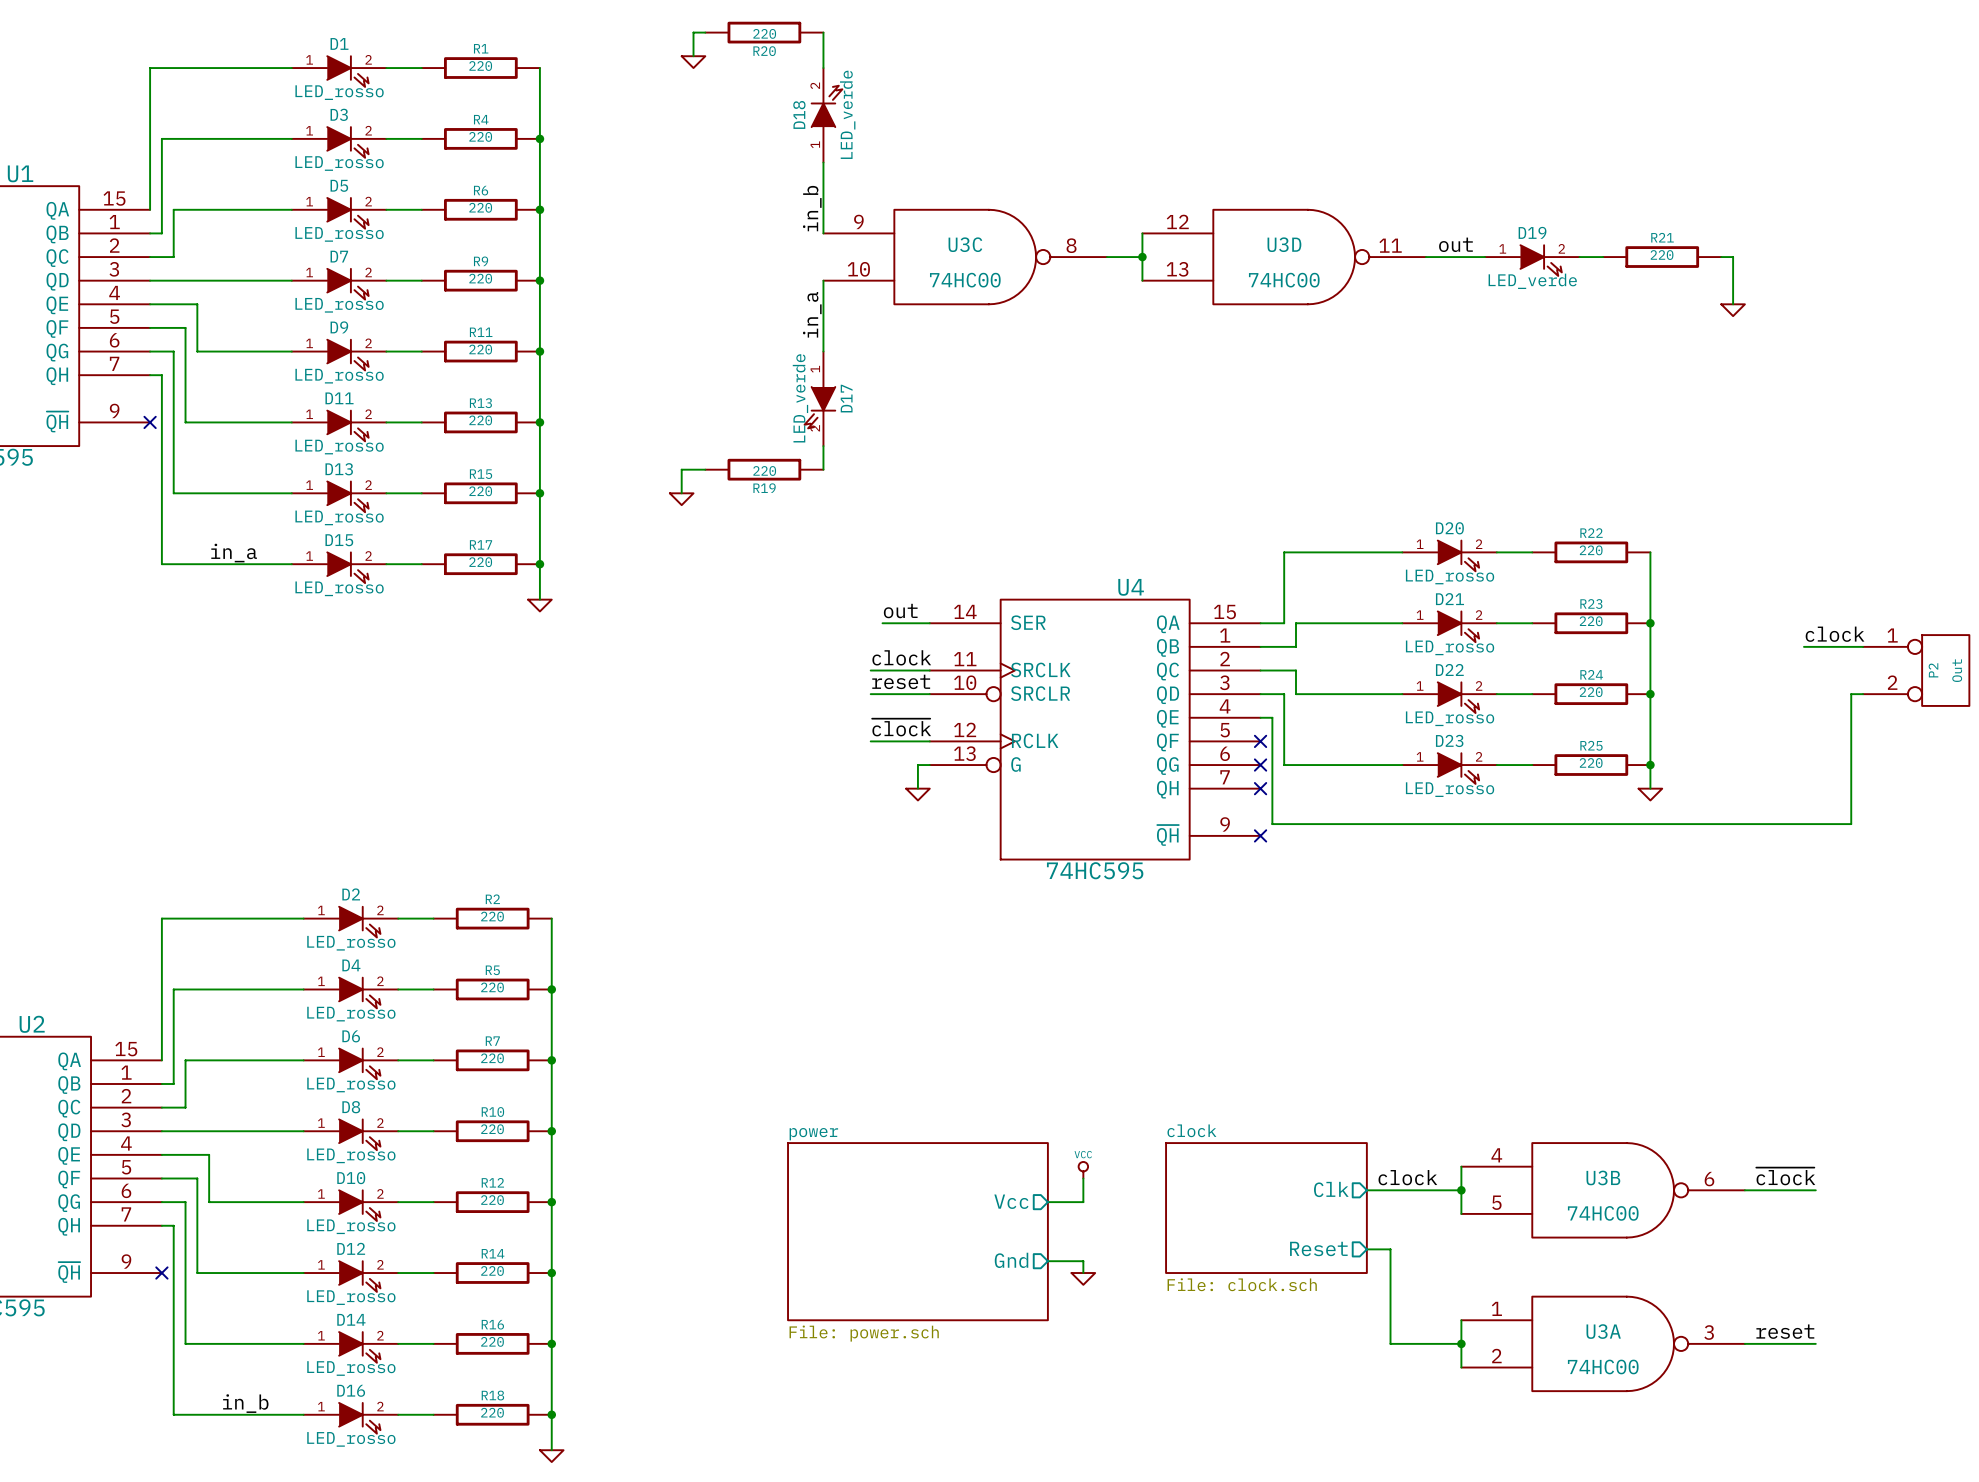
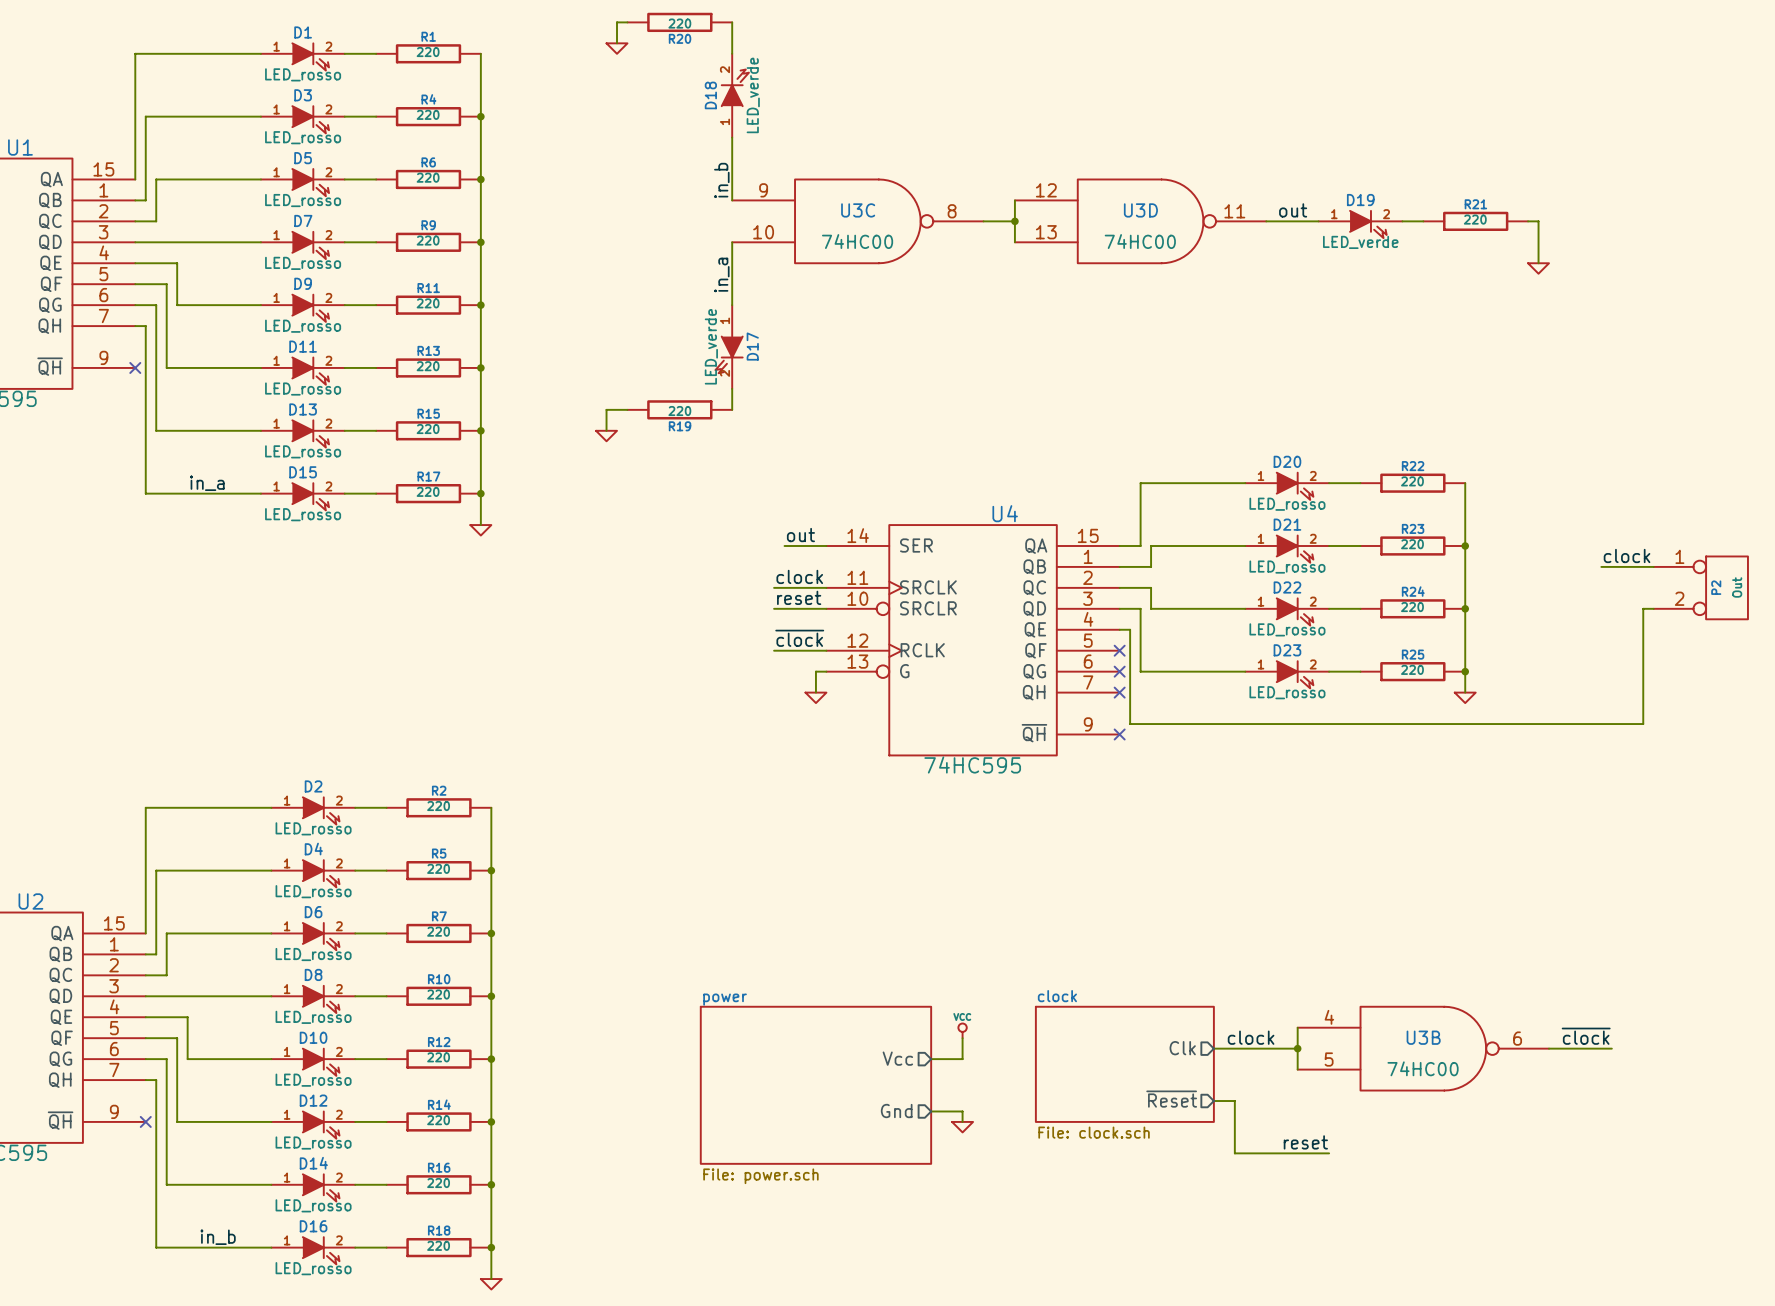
sheet pin: Reset (1318, 1248) -> ~{Reset} (1171, 1099)
label: none -> reset (1305, 1142)
wire: (1390, 1308) (1390, 1343) (1461, 1343) -> (1234, 1153) (1329, 1153)
wire: (1461, 1320) (1461, 1367) -> none
label: reset (1785, 1331) -> none
junction: (1461, 1343) -> none
U3A: 74HC00 (1603, 1343) -> none
wire: (1744, 1343) (1815, 1343) -> none

